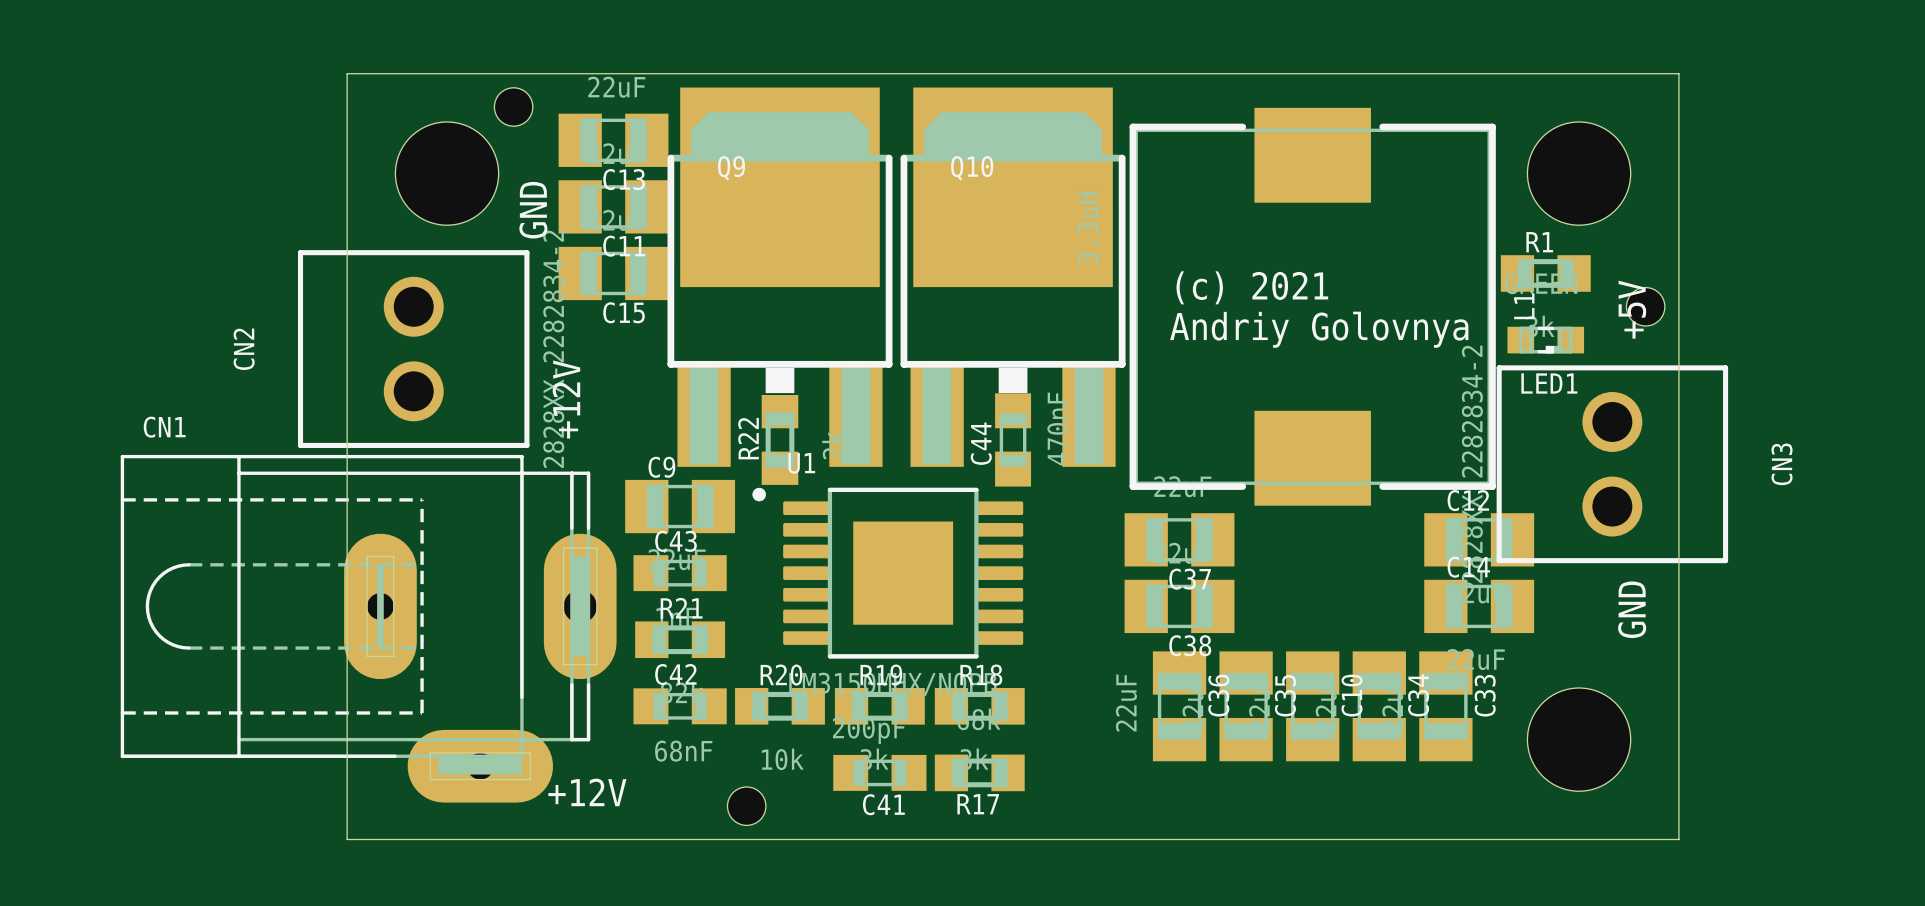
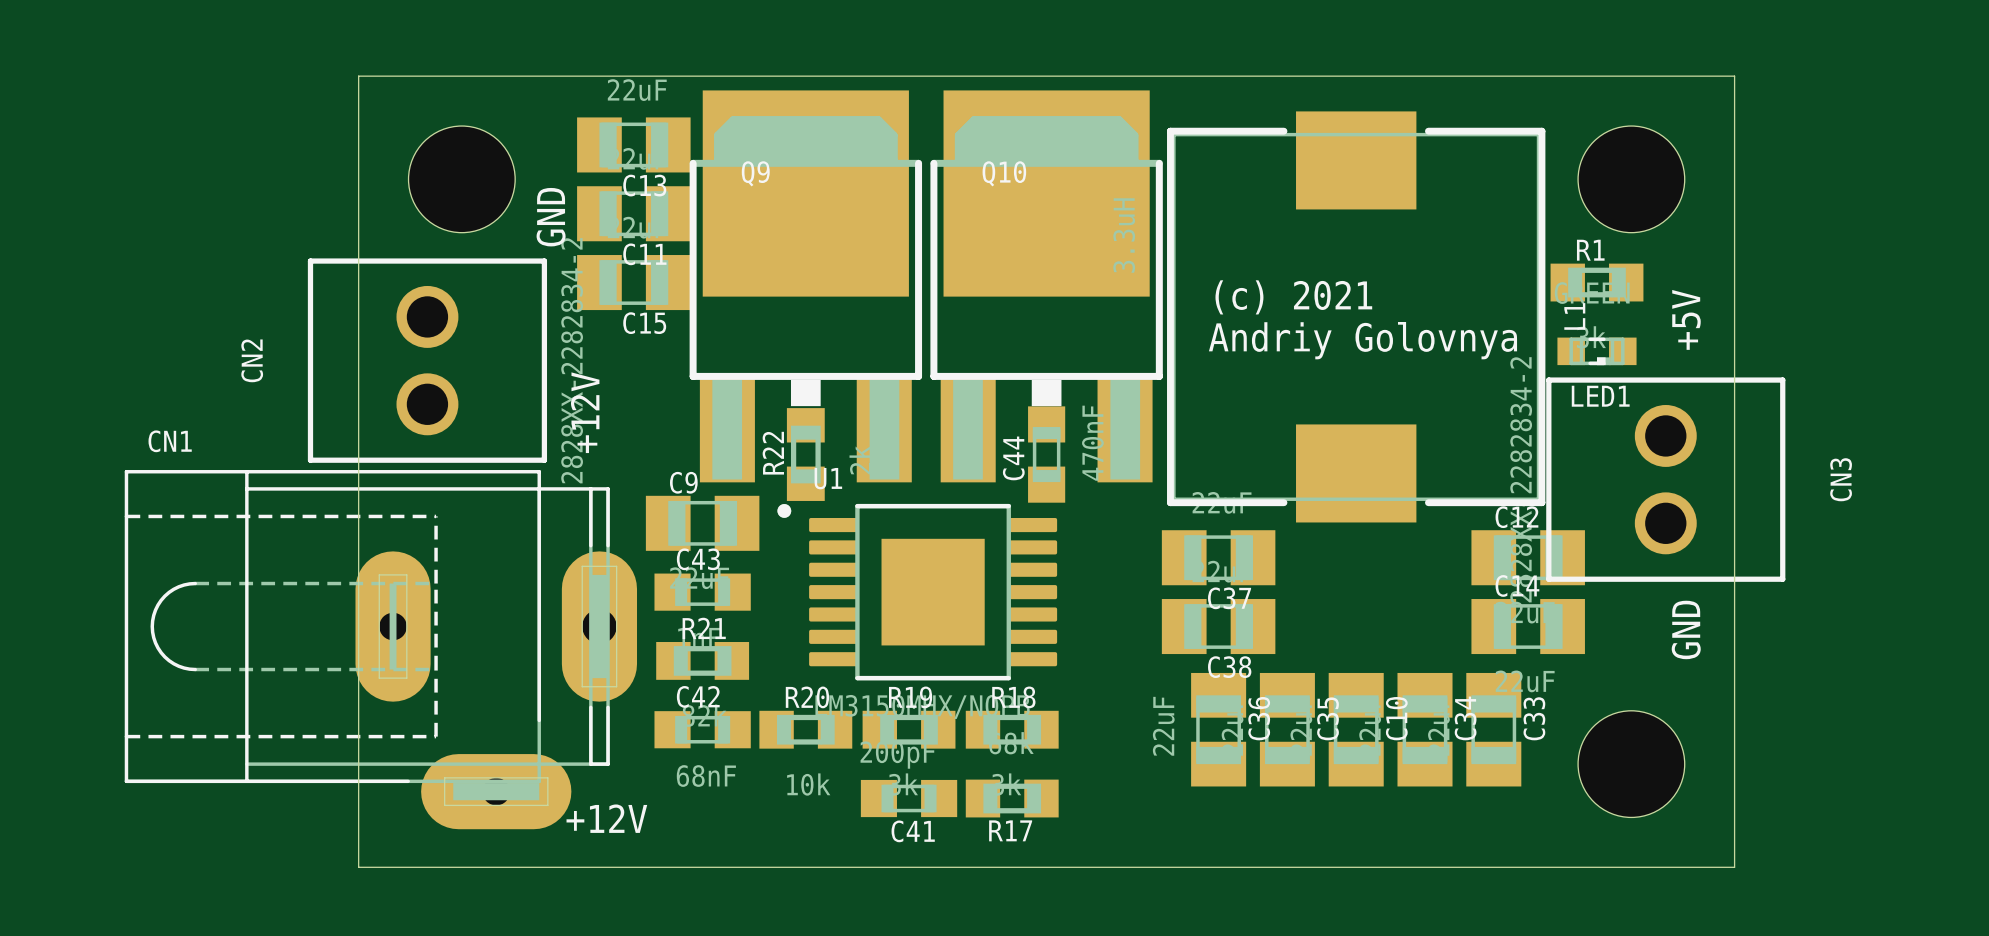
part: (513, 107) -> none
part: (1645, 306) -> none
part: (746, 806) -> none

